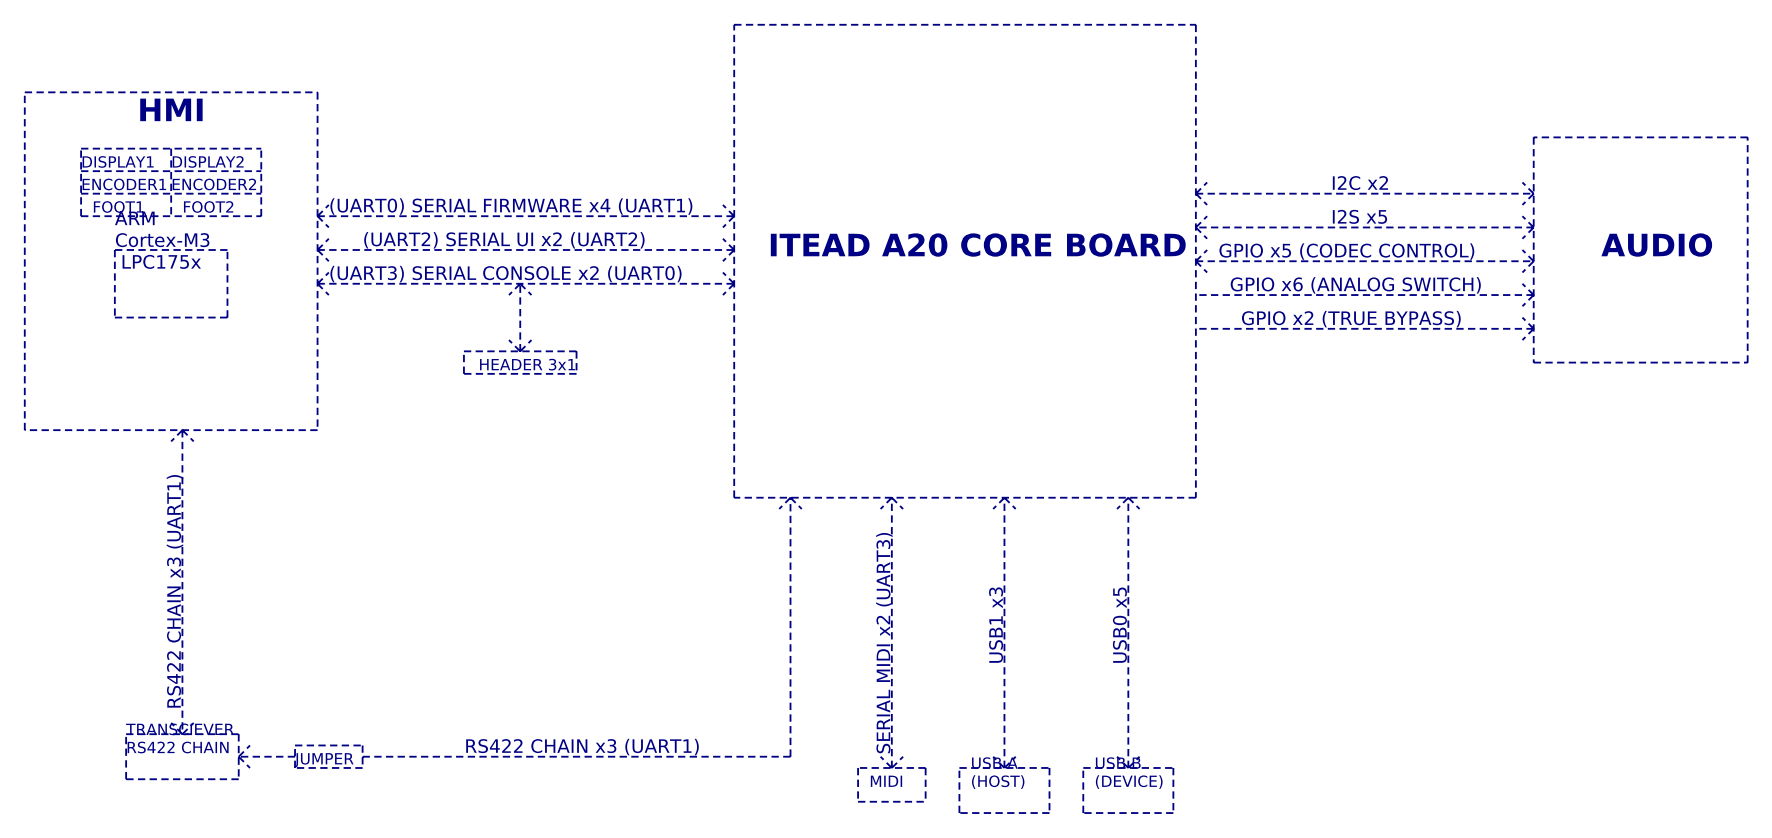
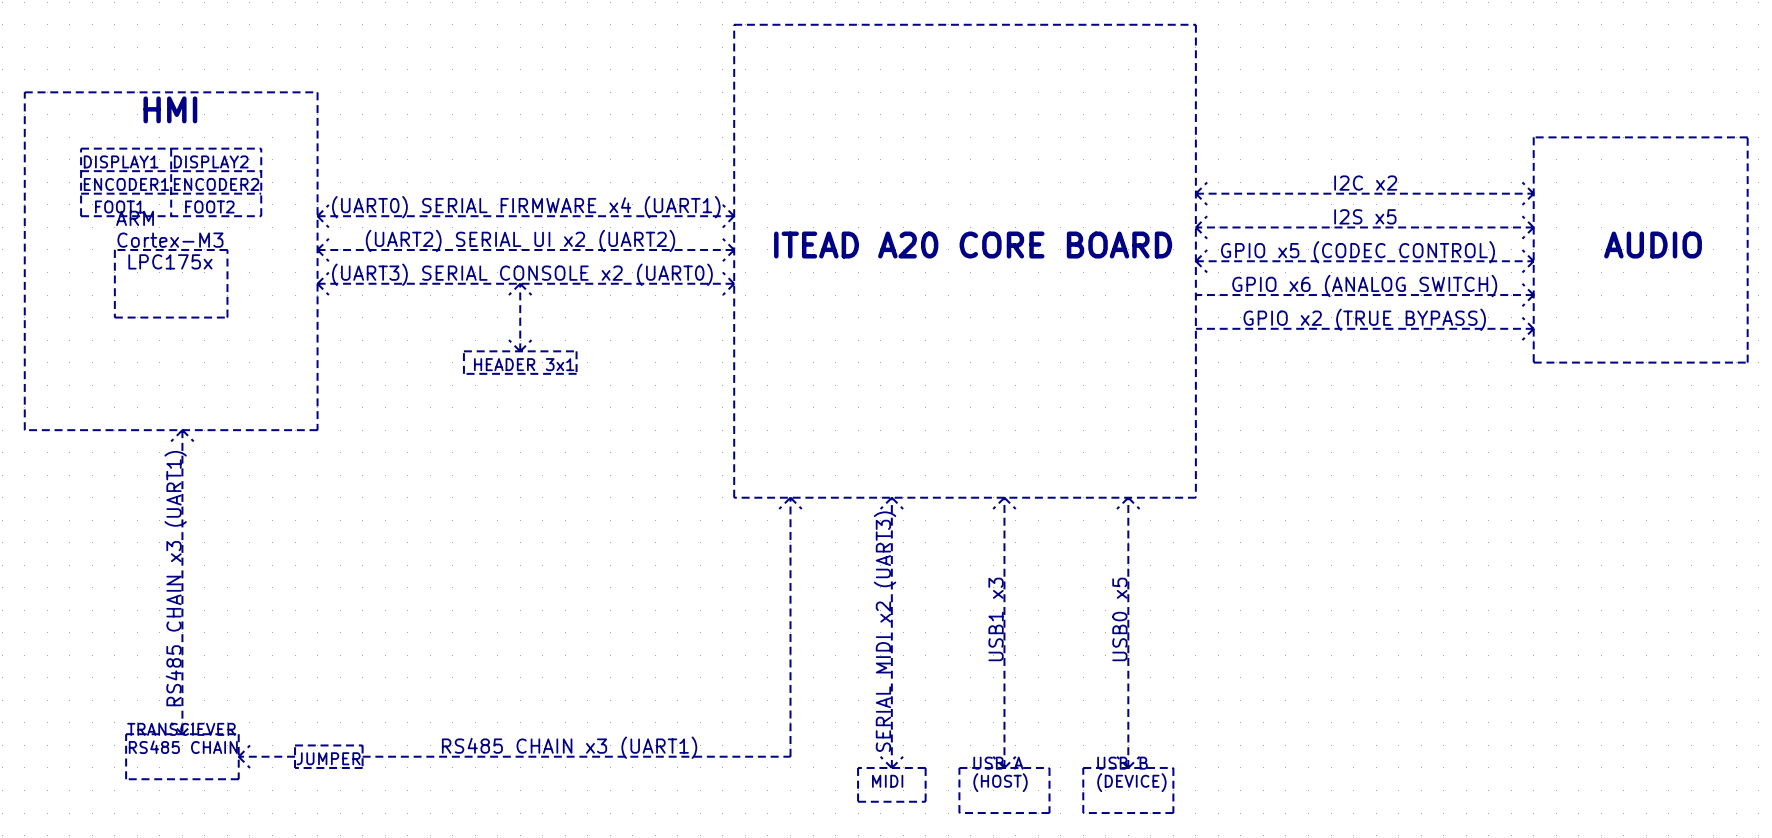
text: RS422 CHAIN x3 (UART1) (174, 591) -> RS485 CHAIN x3 (UART1) (175, 578)
text: RS422 CHAIN (178, 747) -> RS485 CHAIN (183, 747)
text: RS422 CHAIN x3 (UART1) (582, 747) -> RS485 CHAIN x3 (UART1) (569, 747)

